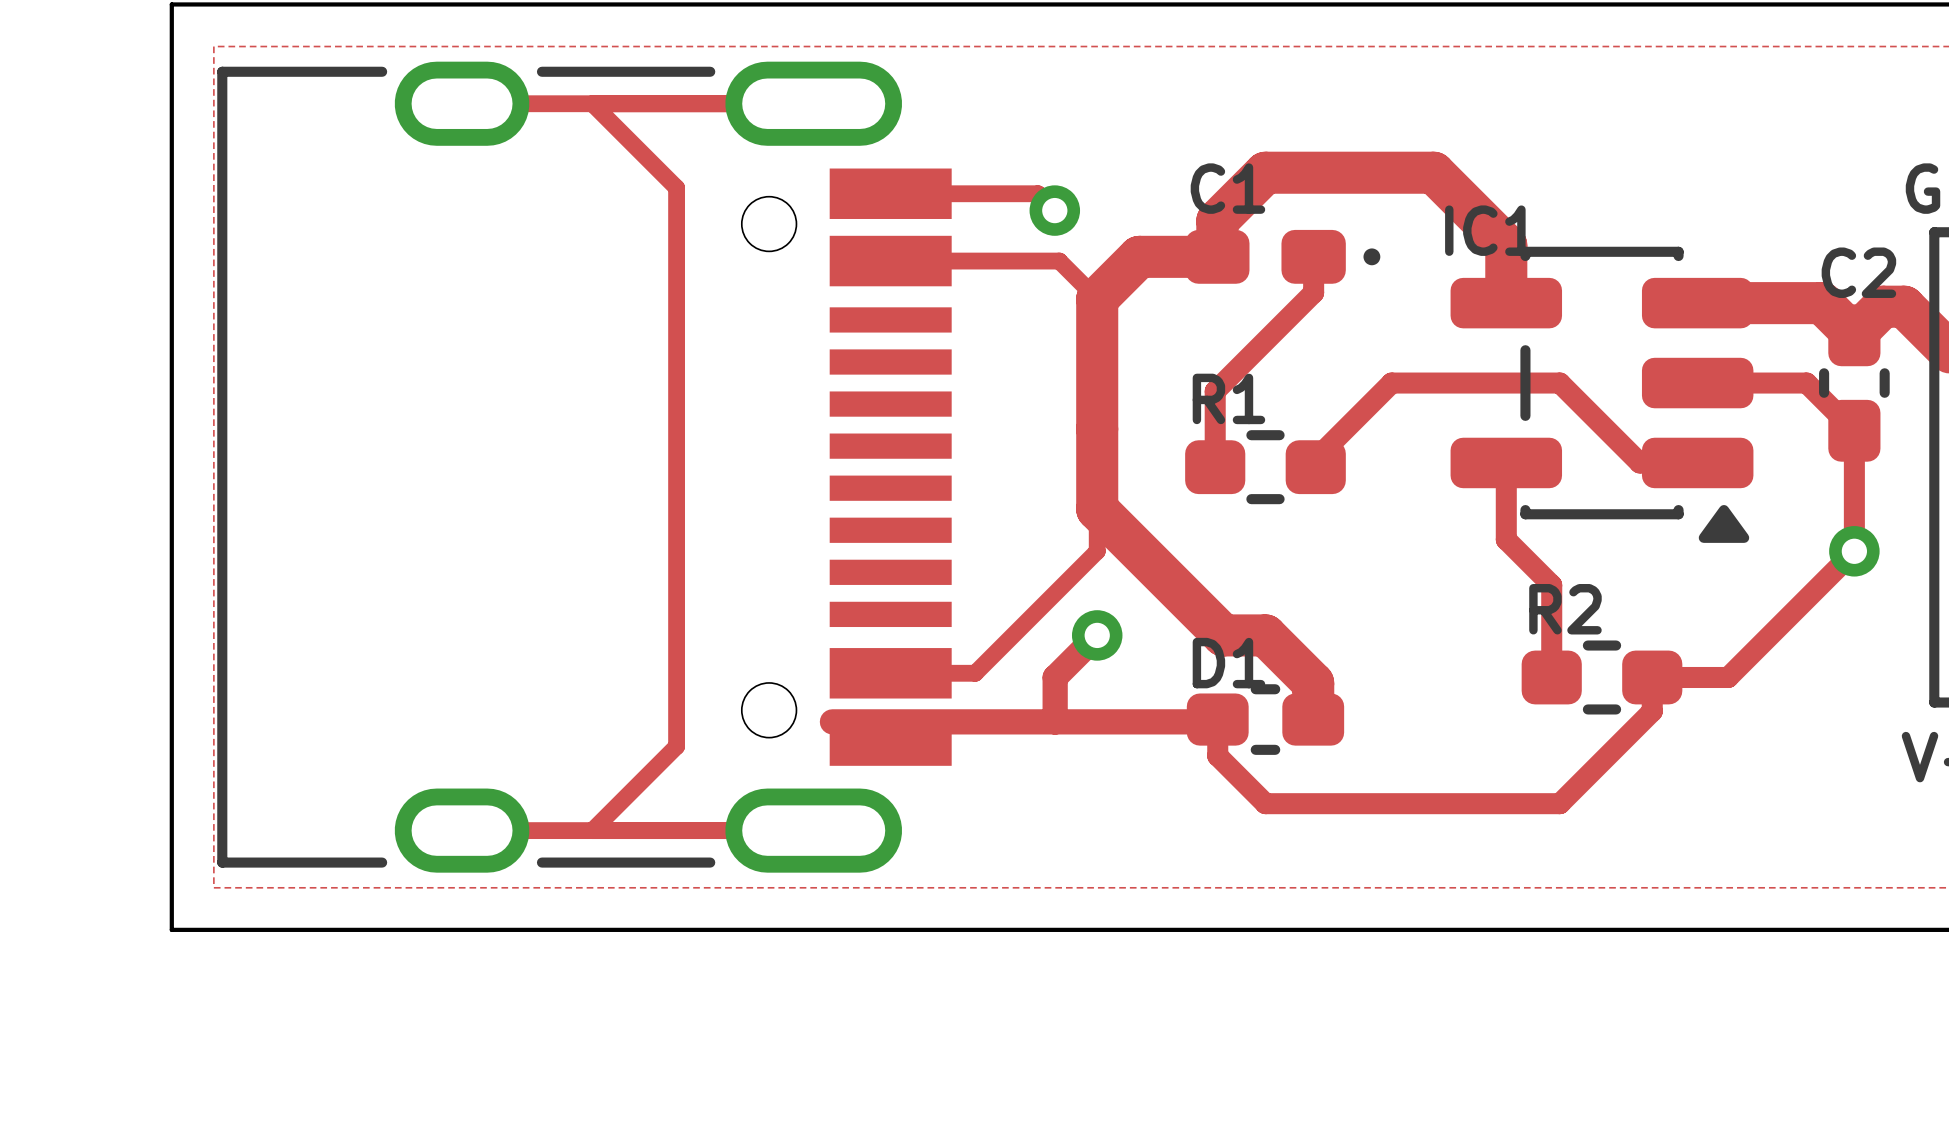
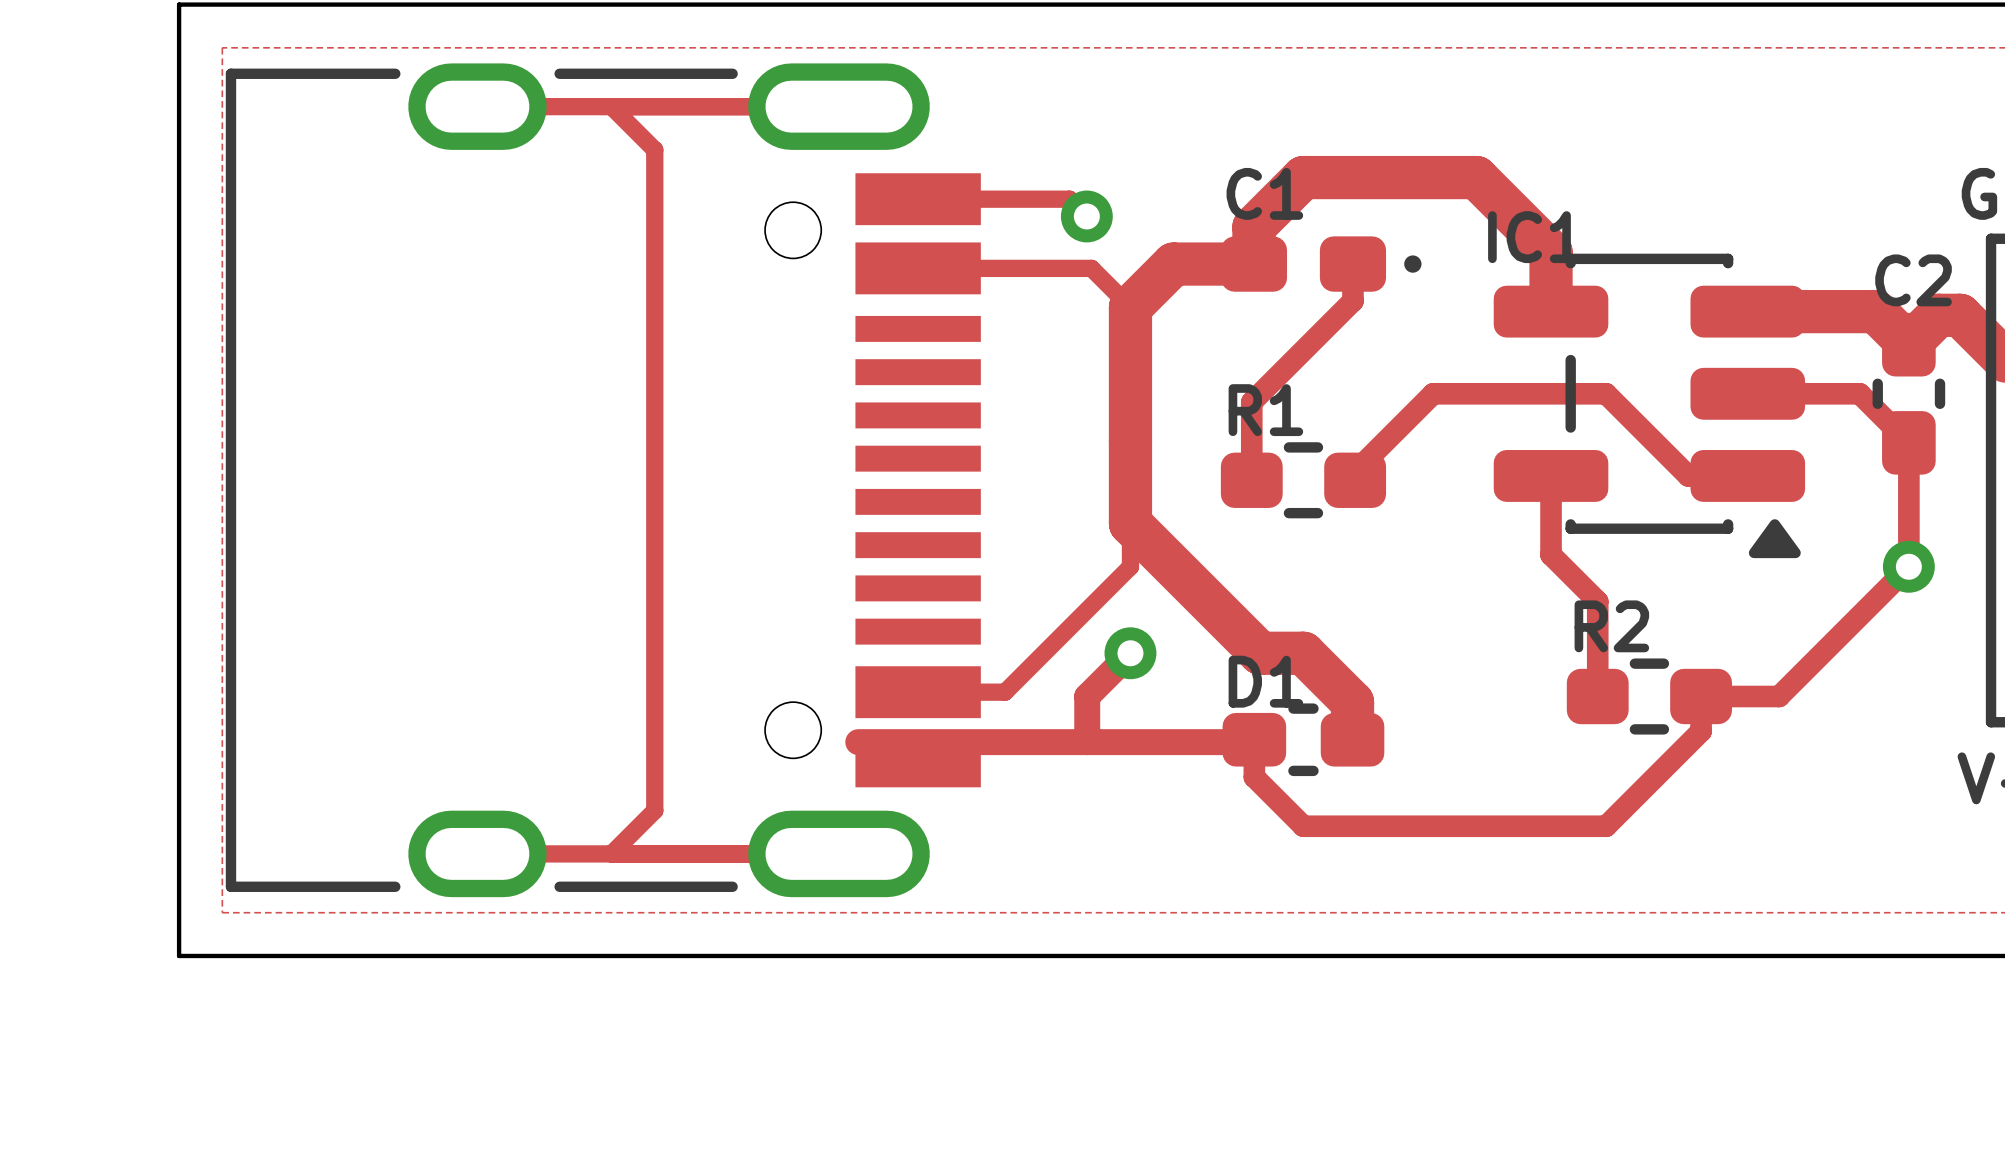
track: (634, 145) (676, 187) (676, 746) (634, 788) -> (654, 149) (654, 810)

